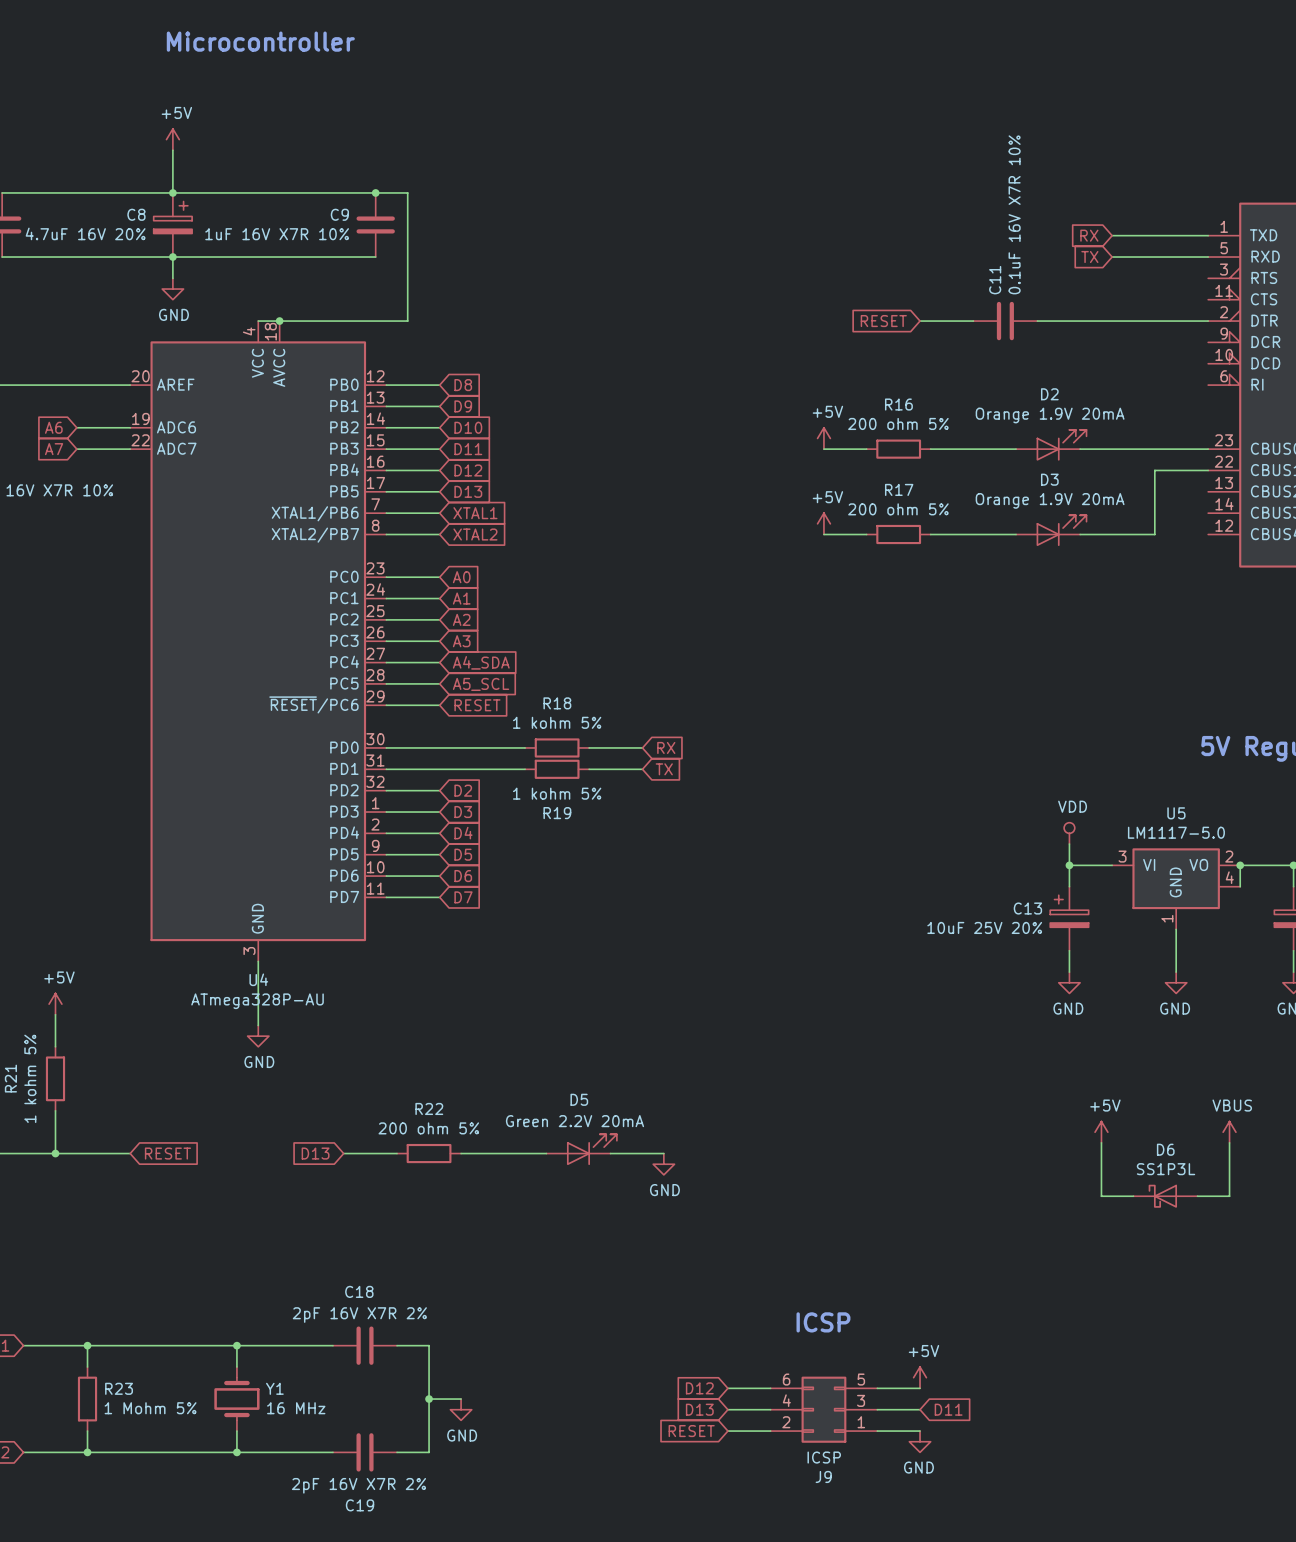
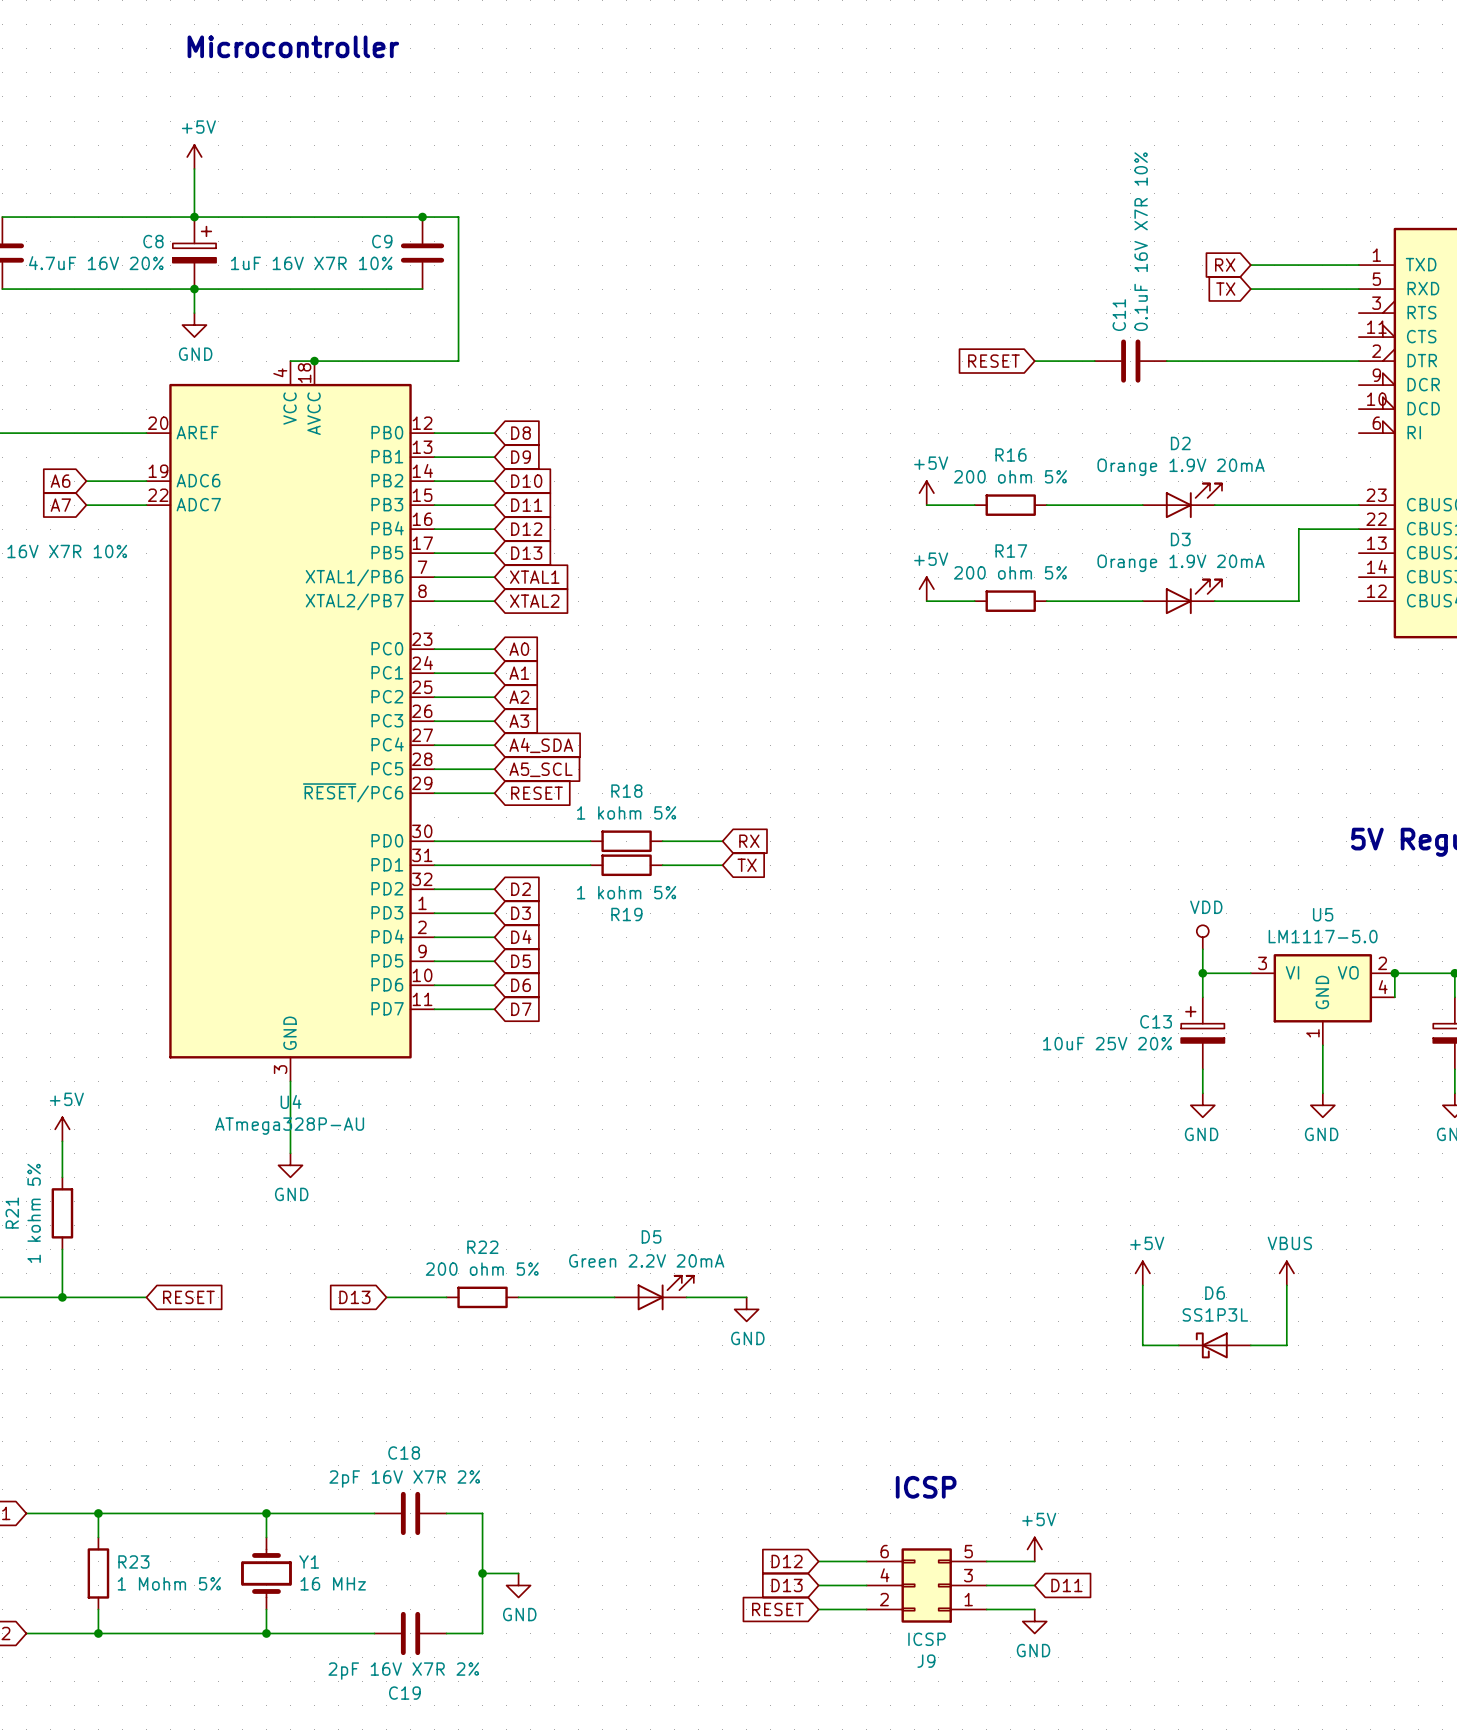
power symbol position: +5V (1101, 1132) -> +5V (1142, 1273)
power symbol position: VBUS (1229, 1132) -> VBUS (1286, 1273)
wire: none -> (1142, 1285) (1142, 1345) (1178, 1345)
wire: (1101, 1142) (1101, 1196) (1112, 1196) -> none
wire: none -> (1286, 1285) (1286, 1345) (1274, 1345)
wire: (1229, 1142) (1229, 1196) (1197, 1196) -> none
D6 position: (1165, 1196) -> (1214, 1345)

